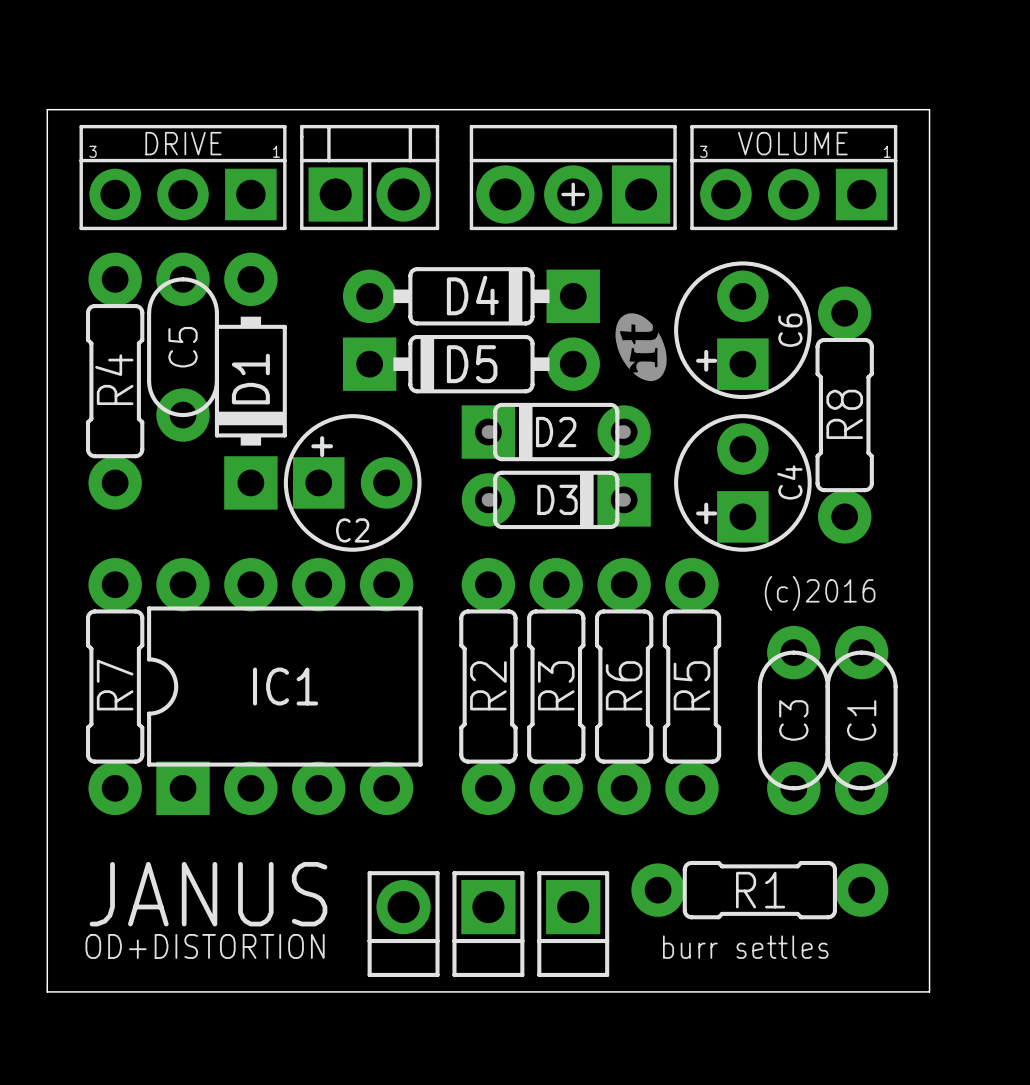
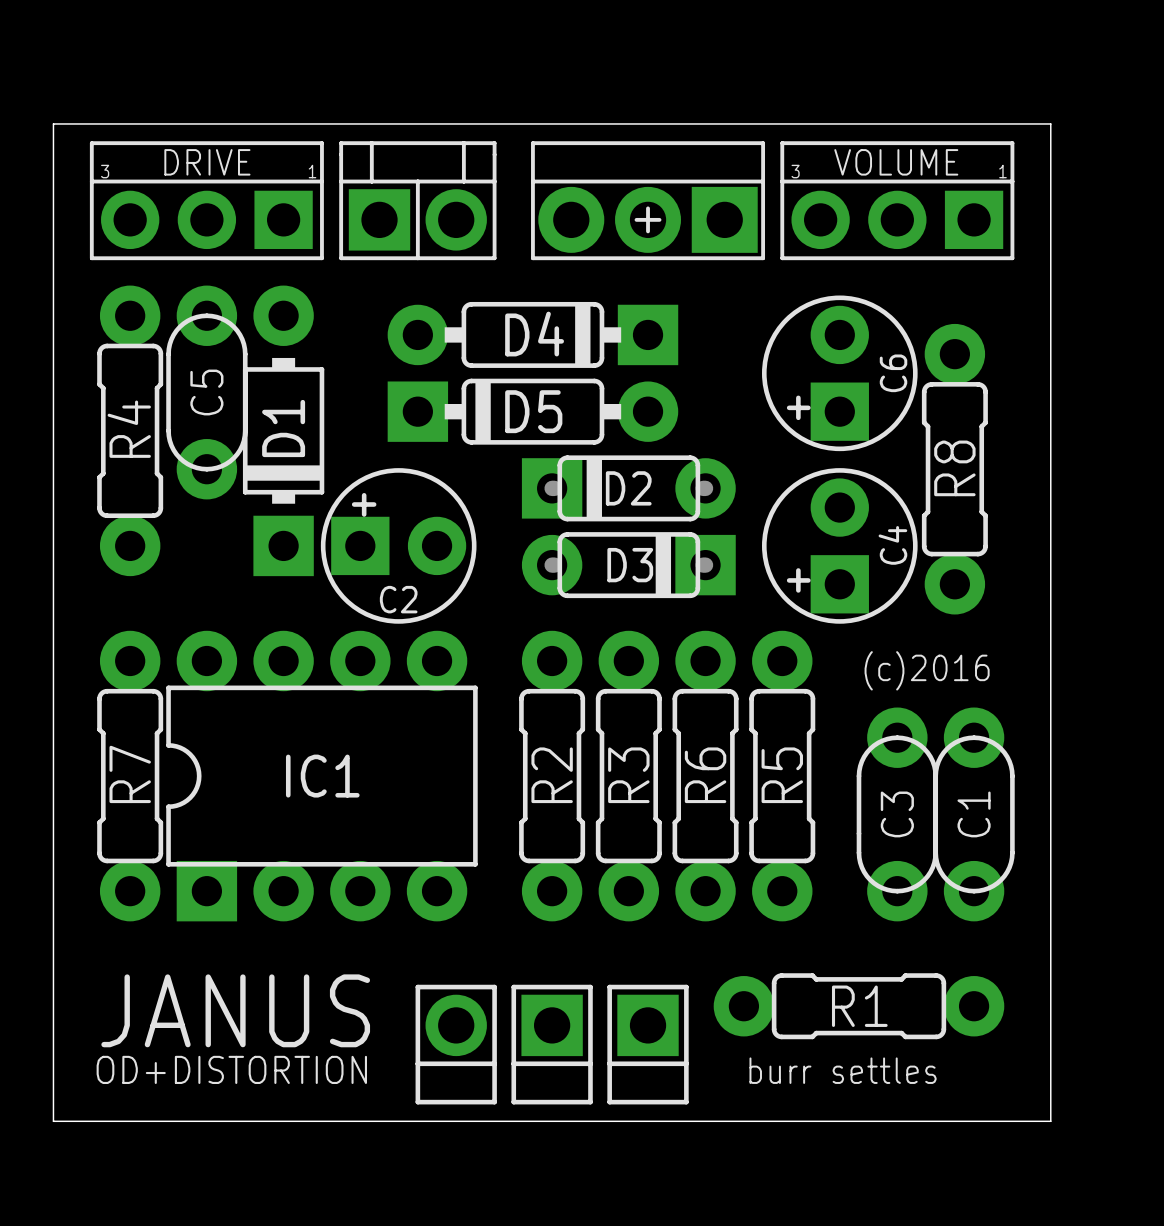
drawing: [615, 313, 667, 382] -> none

